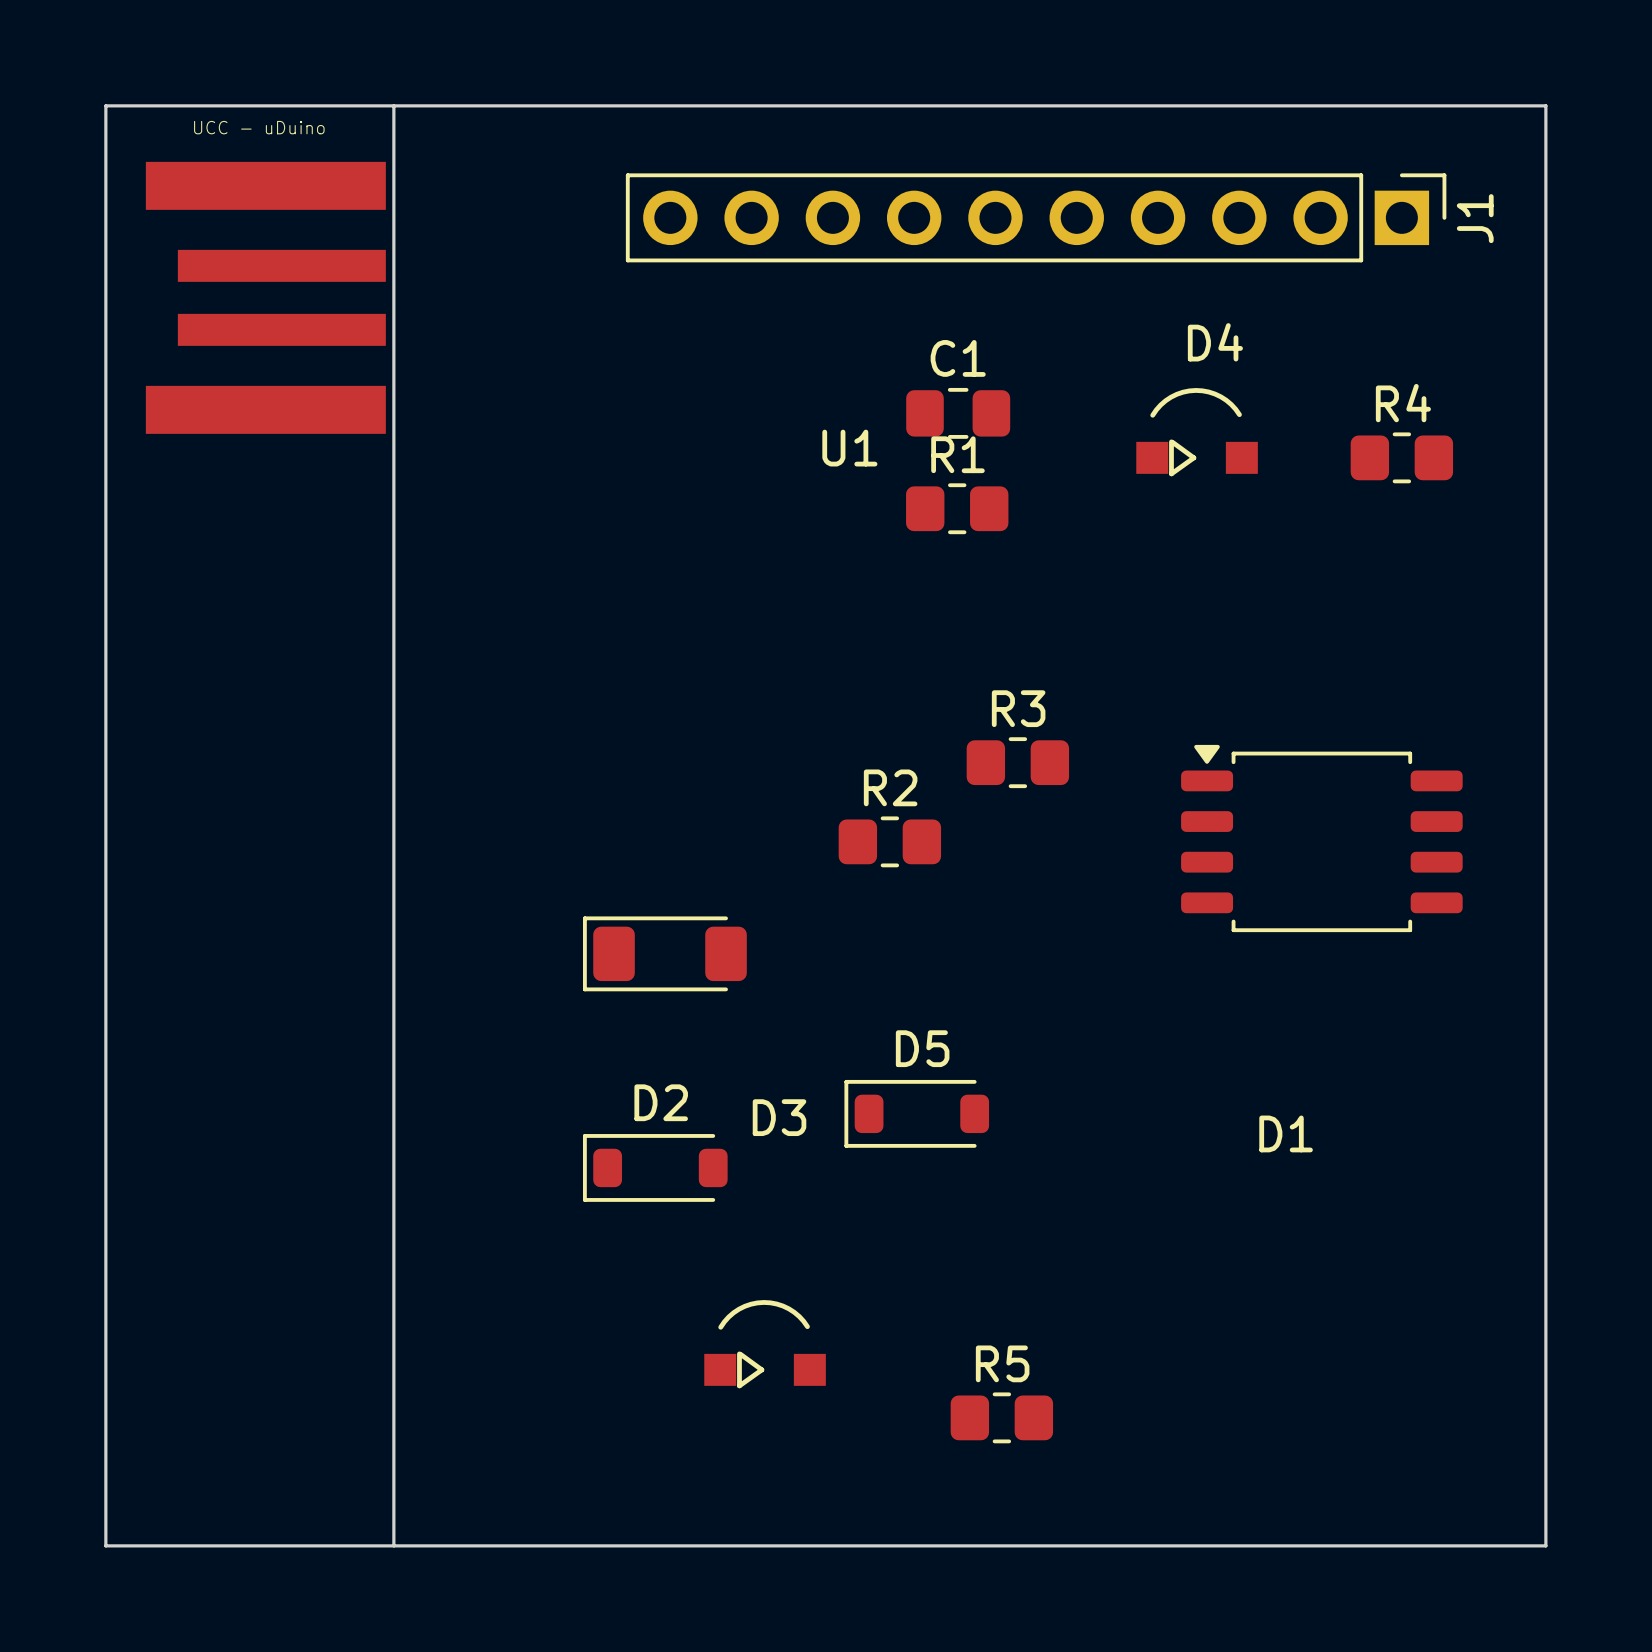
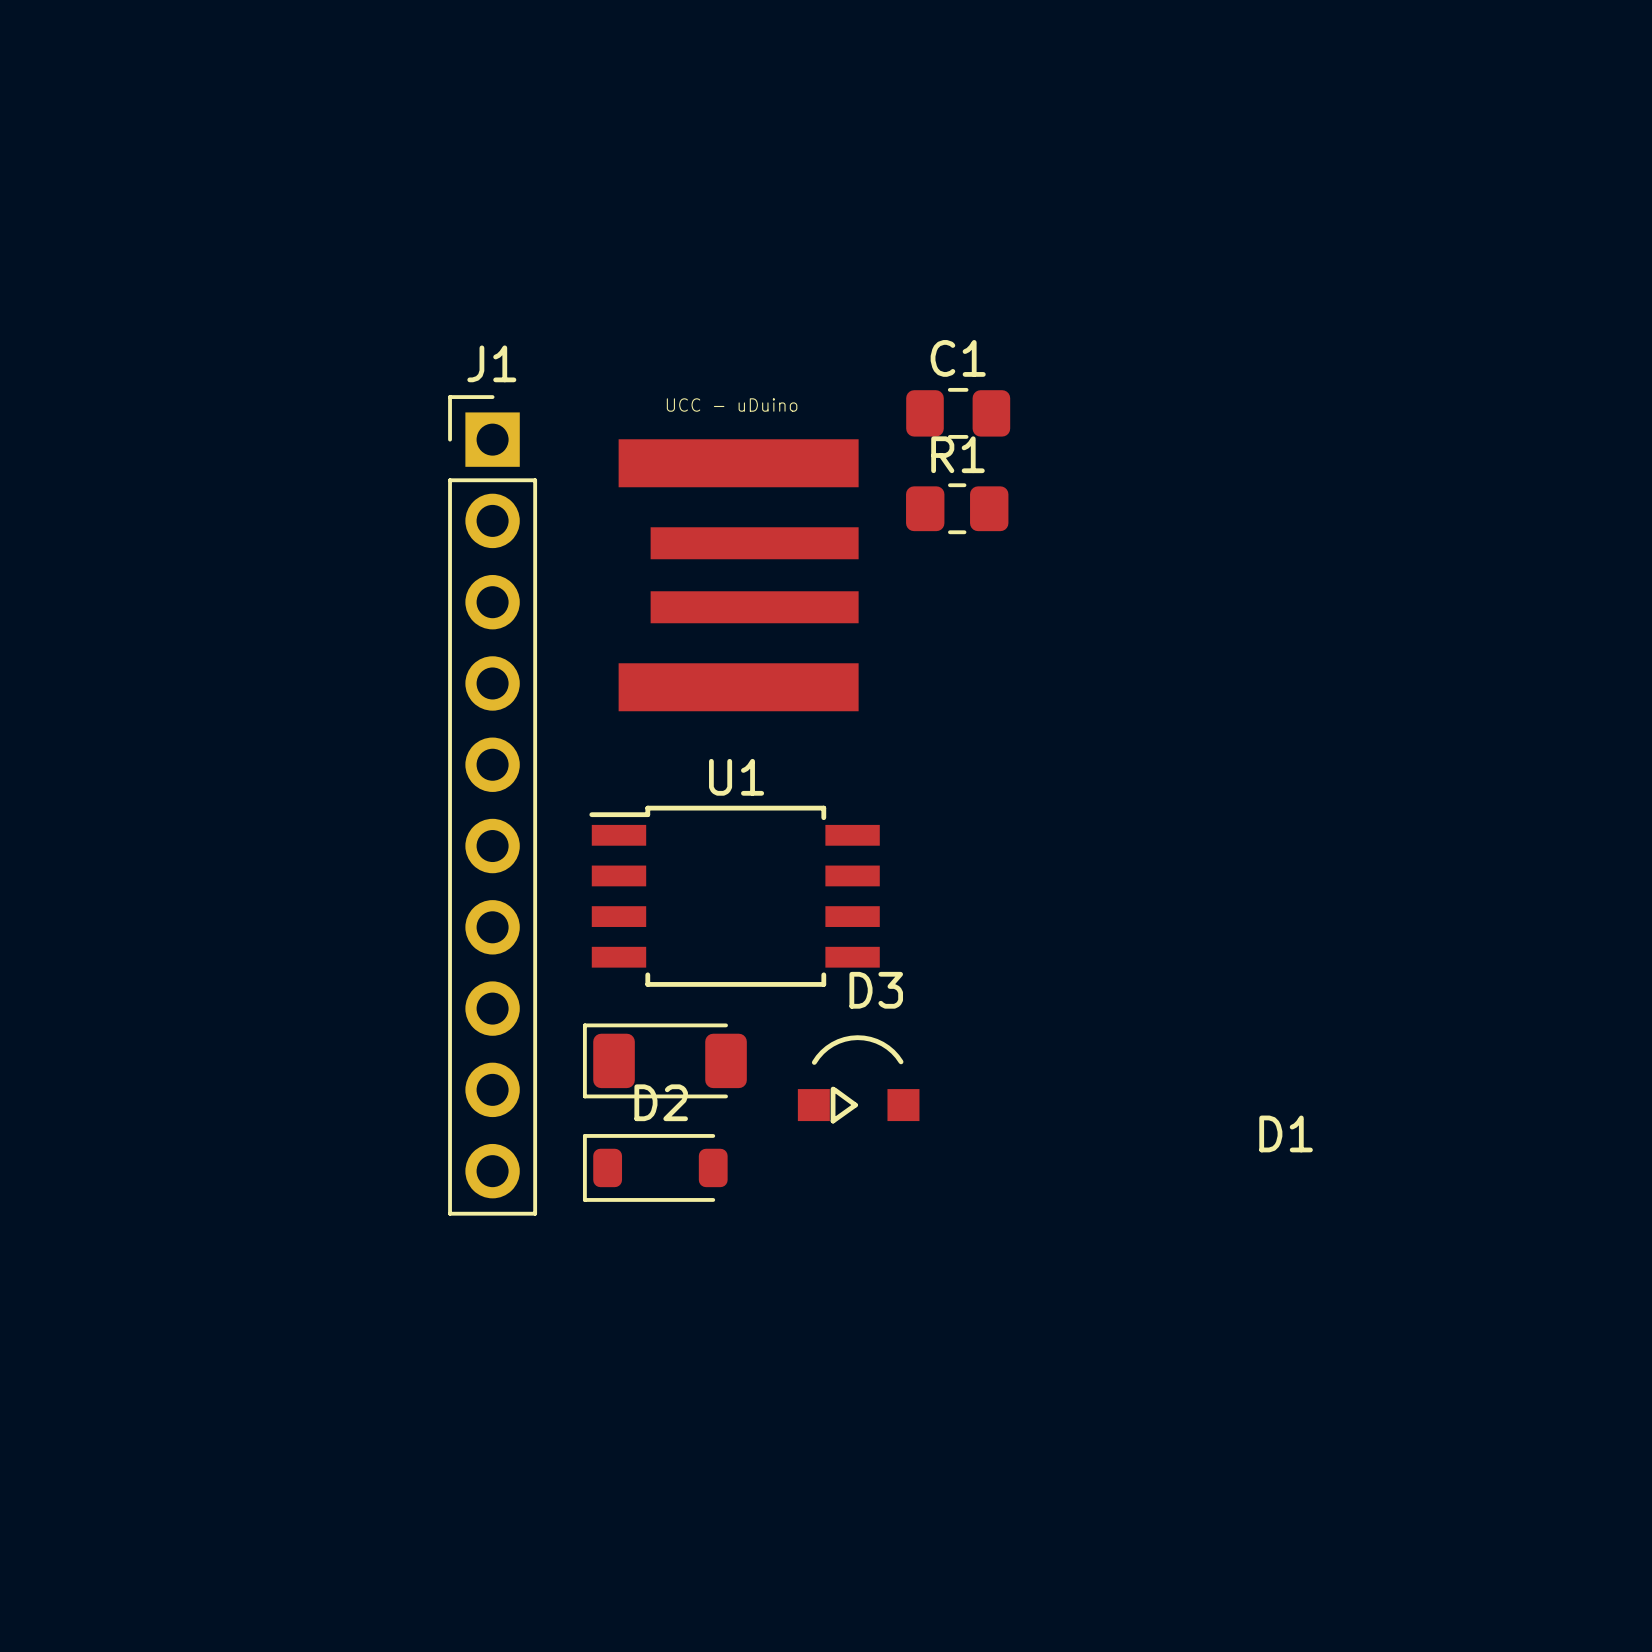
board edge: (105, 105) (1545, 105) (1545, 1545) (105, 1545) (105, 105) -> none
board edge: (393, 105) (393, 1545) -> none
J1 rotation: 0° (1036, 217) -> 90° counterclockwise (492, 805)
J1 position: (1036, 217) -> (492, 805)
part position: (265, 297) -> (738, 575)
D4: (1197, 432) -> none
U1 name position: U1 (849, 448) -> U1 (736, 777)
R4: (1401, 457) -> none
U1 footprint: [1181, 744, 1463, 933] -> [589, 805, 880, 987]
R3: (1017, 762) -> none
R2: (889, 841) -> none
D1 position: (664, 953) -> (664, 1060)
D5: (916, 1113) -> none
D3 name position: D3 (779, 1117) -> D3 (876, 990)
D3 position: (765, 1344) -> (858, 1079)
R5: (1001, 1417) -> none

